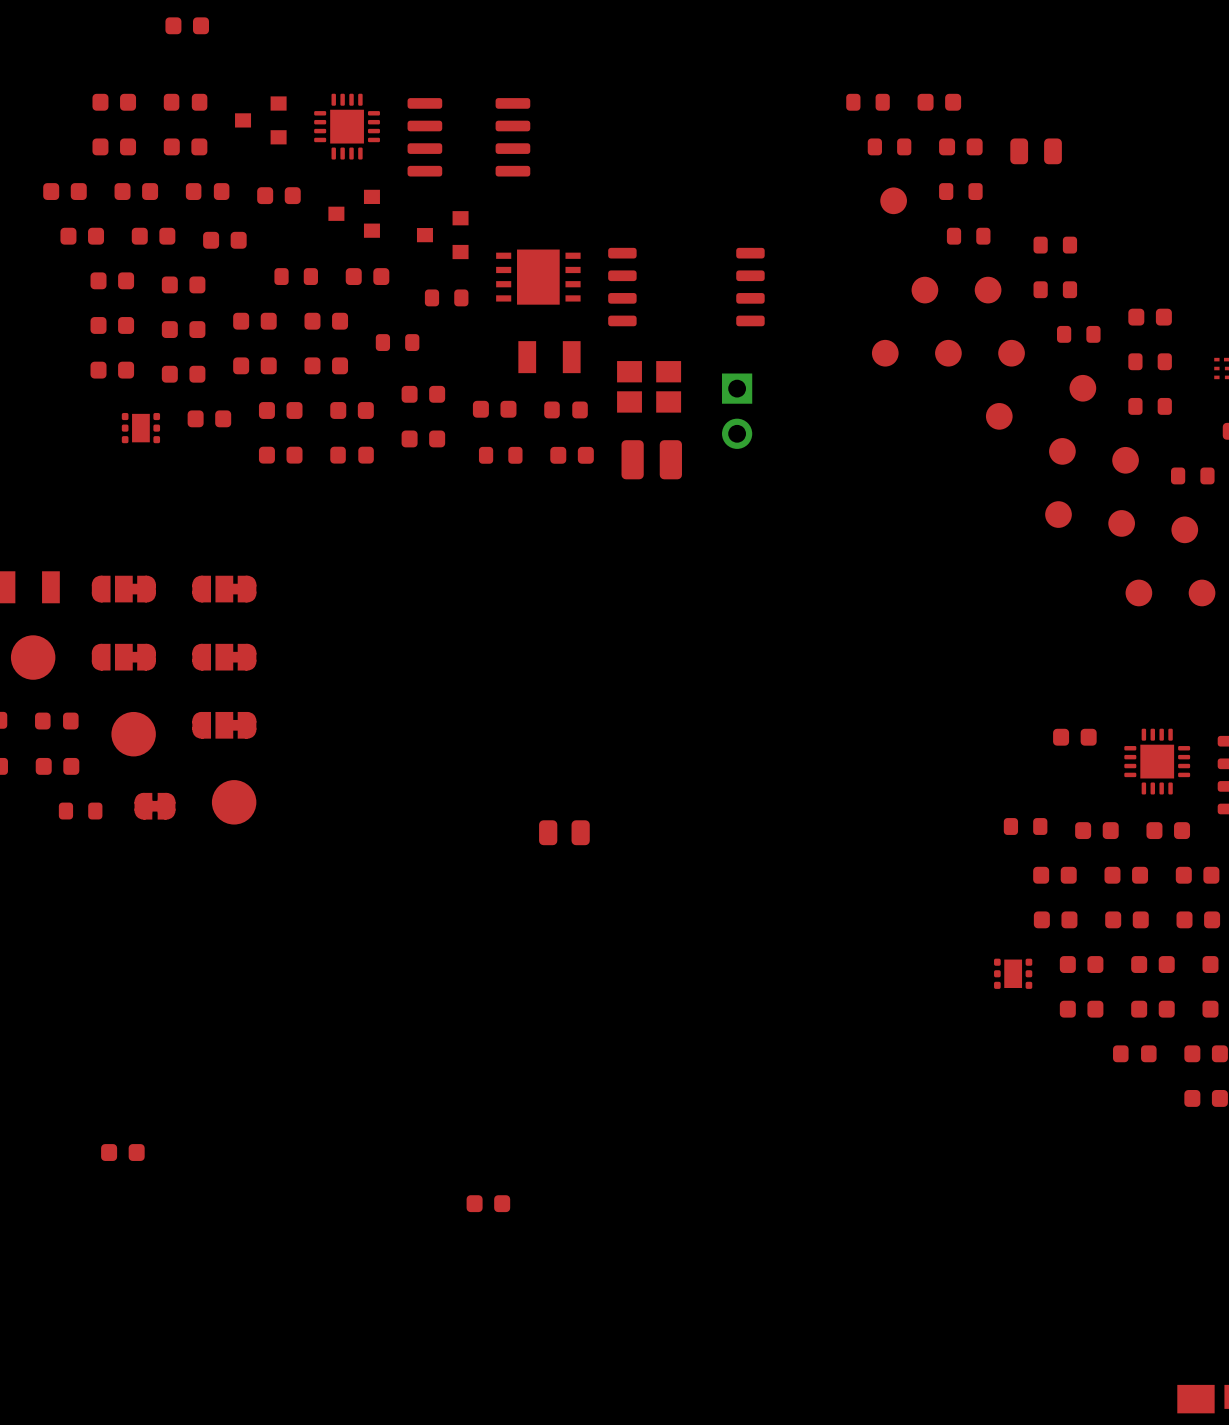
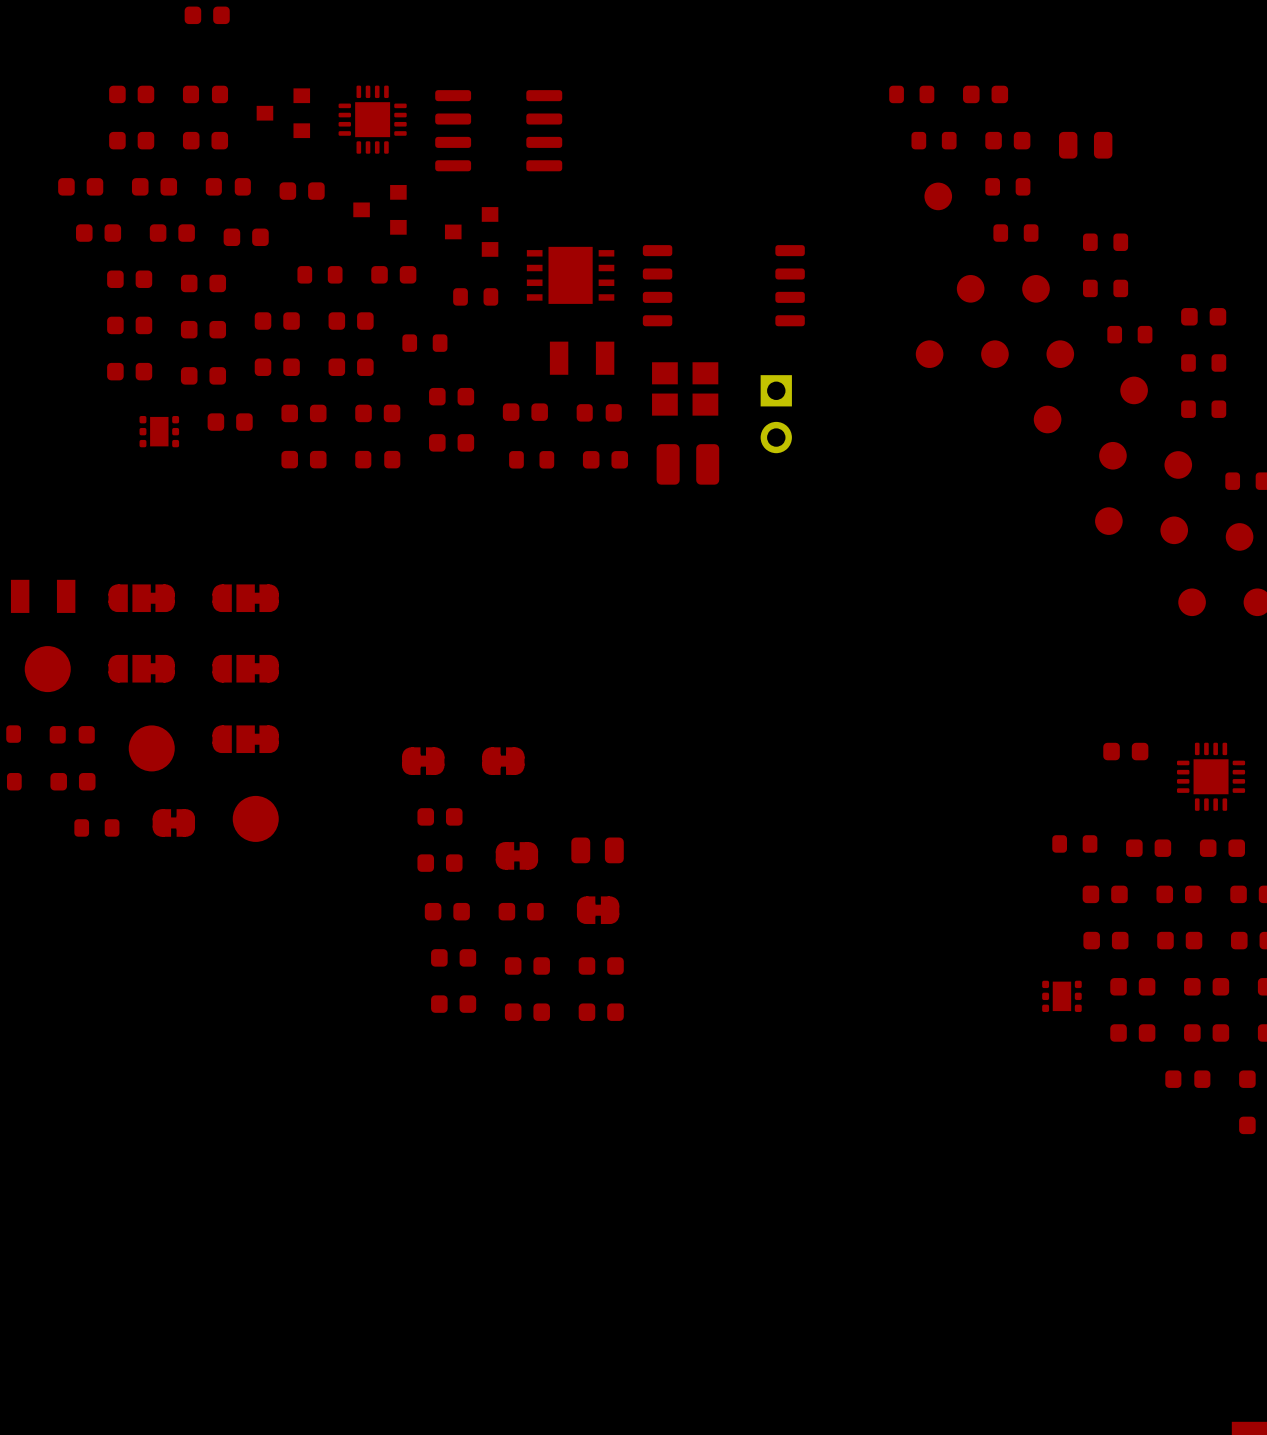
part: none -> (423, 761)
part: none -> (503, 761)
part: none -> (439, 816)
part: none -> (516, 855)
part: none -> (439, 863)
part: none -> (598, 910)
part: none -> (447, 911)
part: none -> (521, 911)
part: none -> (453, 957)
part: none -> (527, 965)
part: none -> (601, 965)
part: none -> (453, 1004)
part: none -> (527, 1012)
part: none -> (601, 1012)
part: (122, 1152) -> none
part: (488, 1203) -> none

